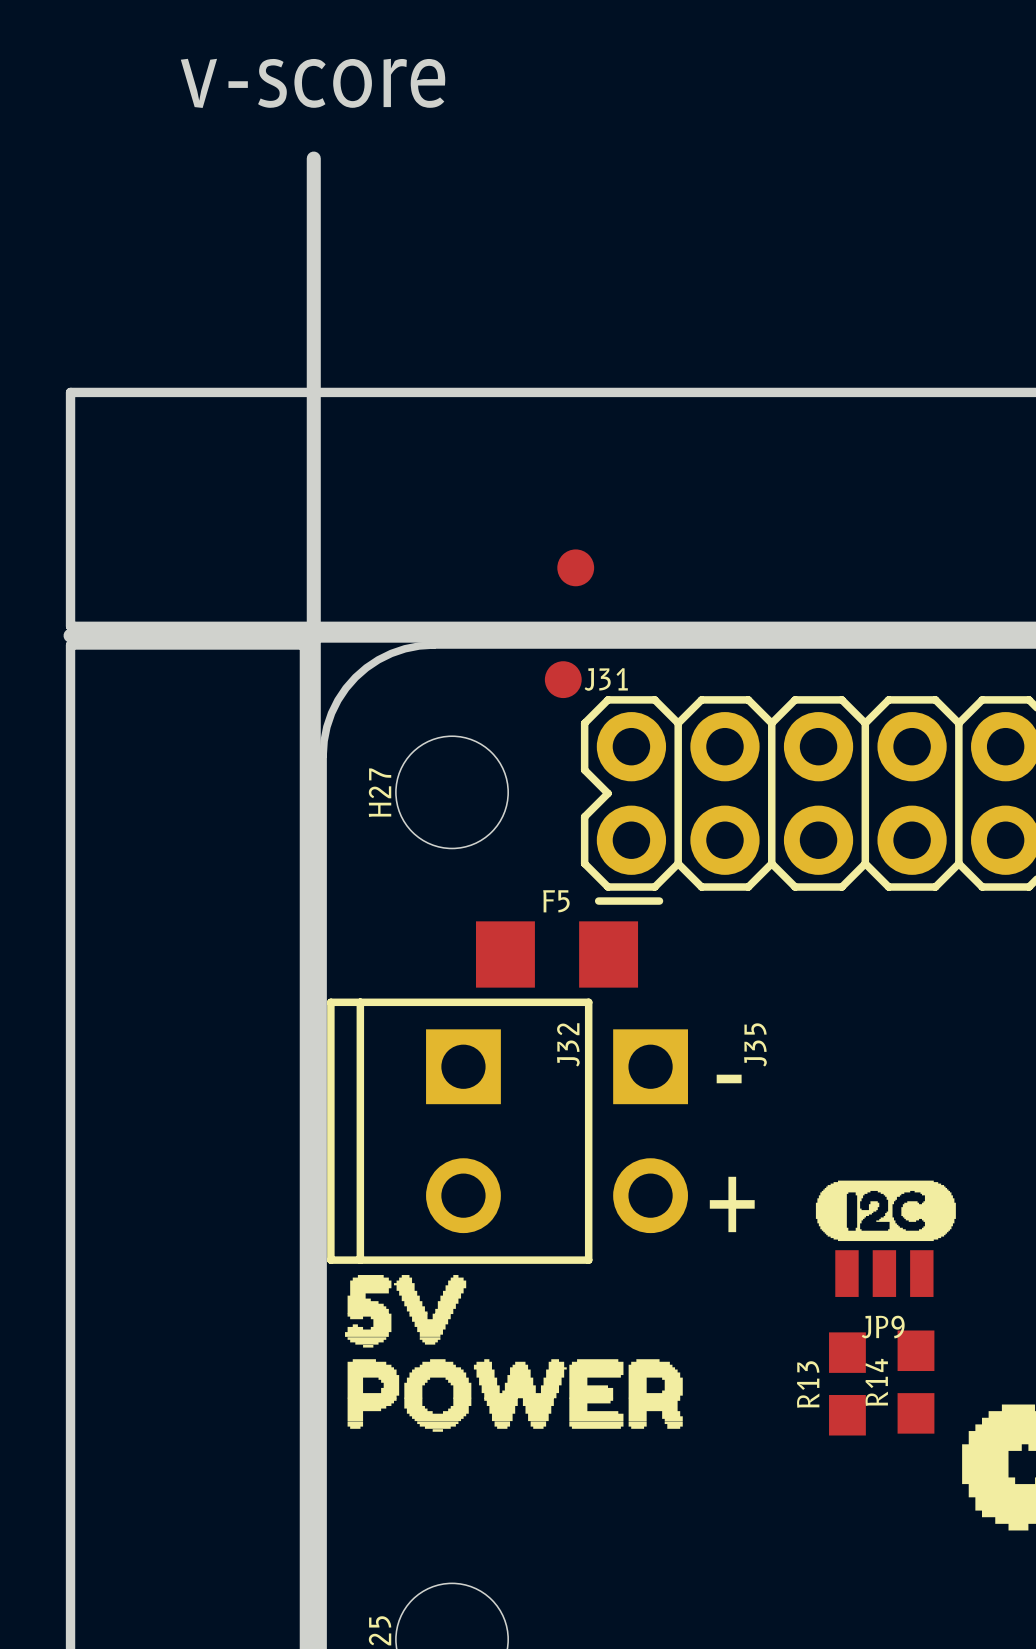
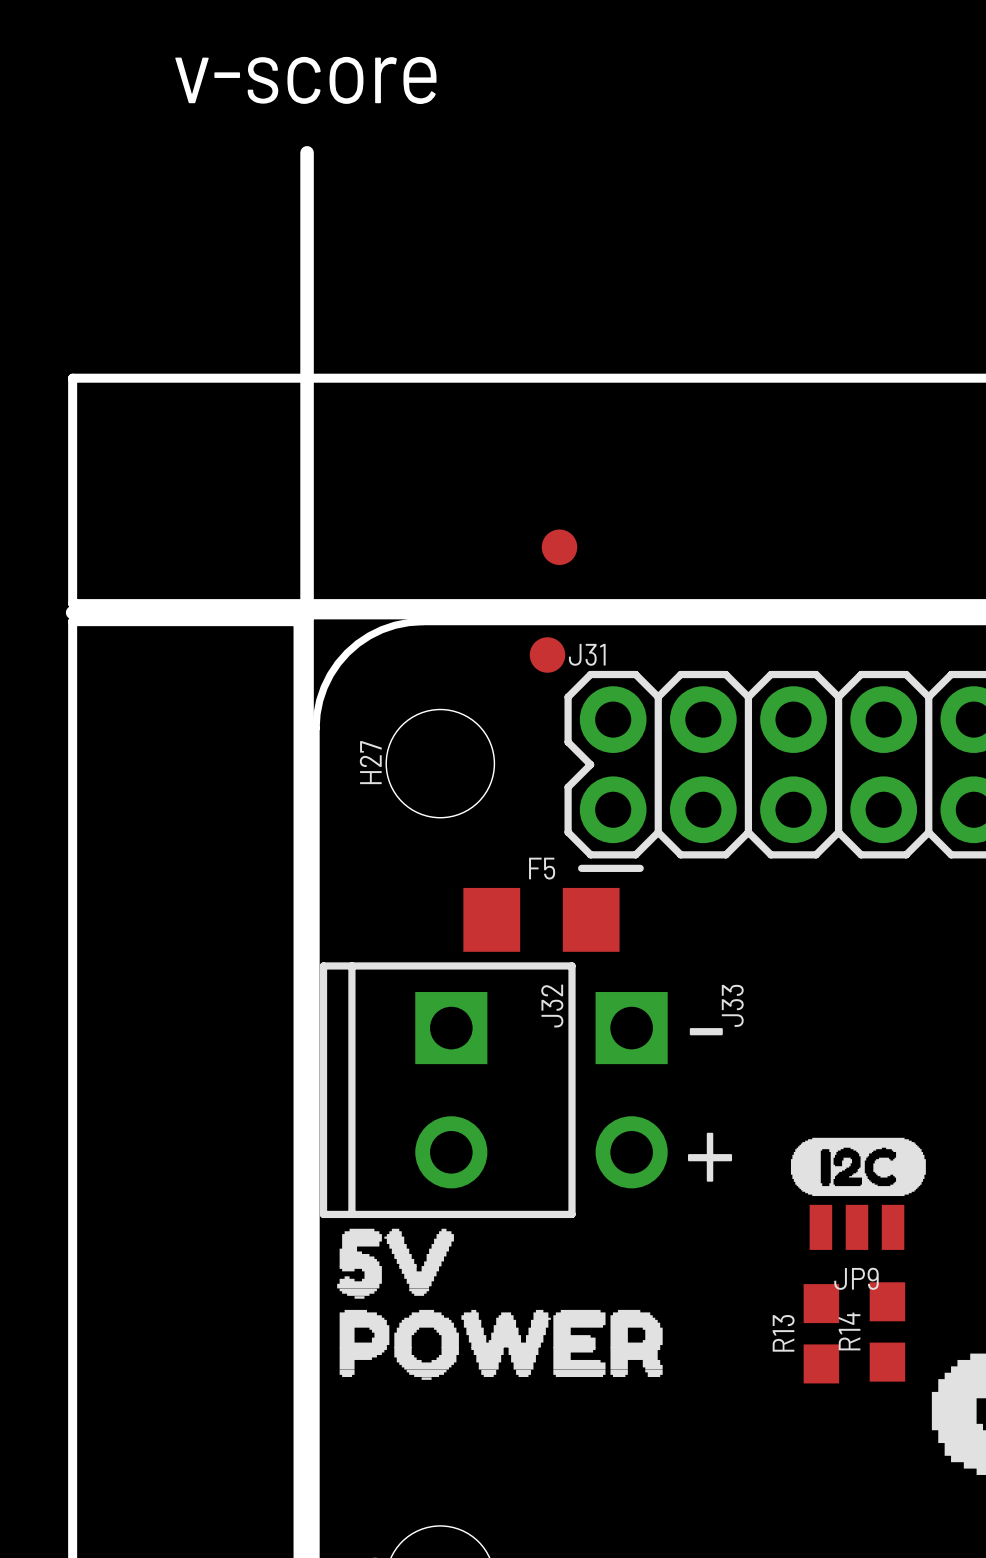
J35 name: J35 (755, 1044) -> J33 (732, 1005)

